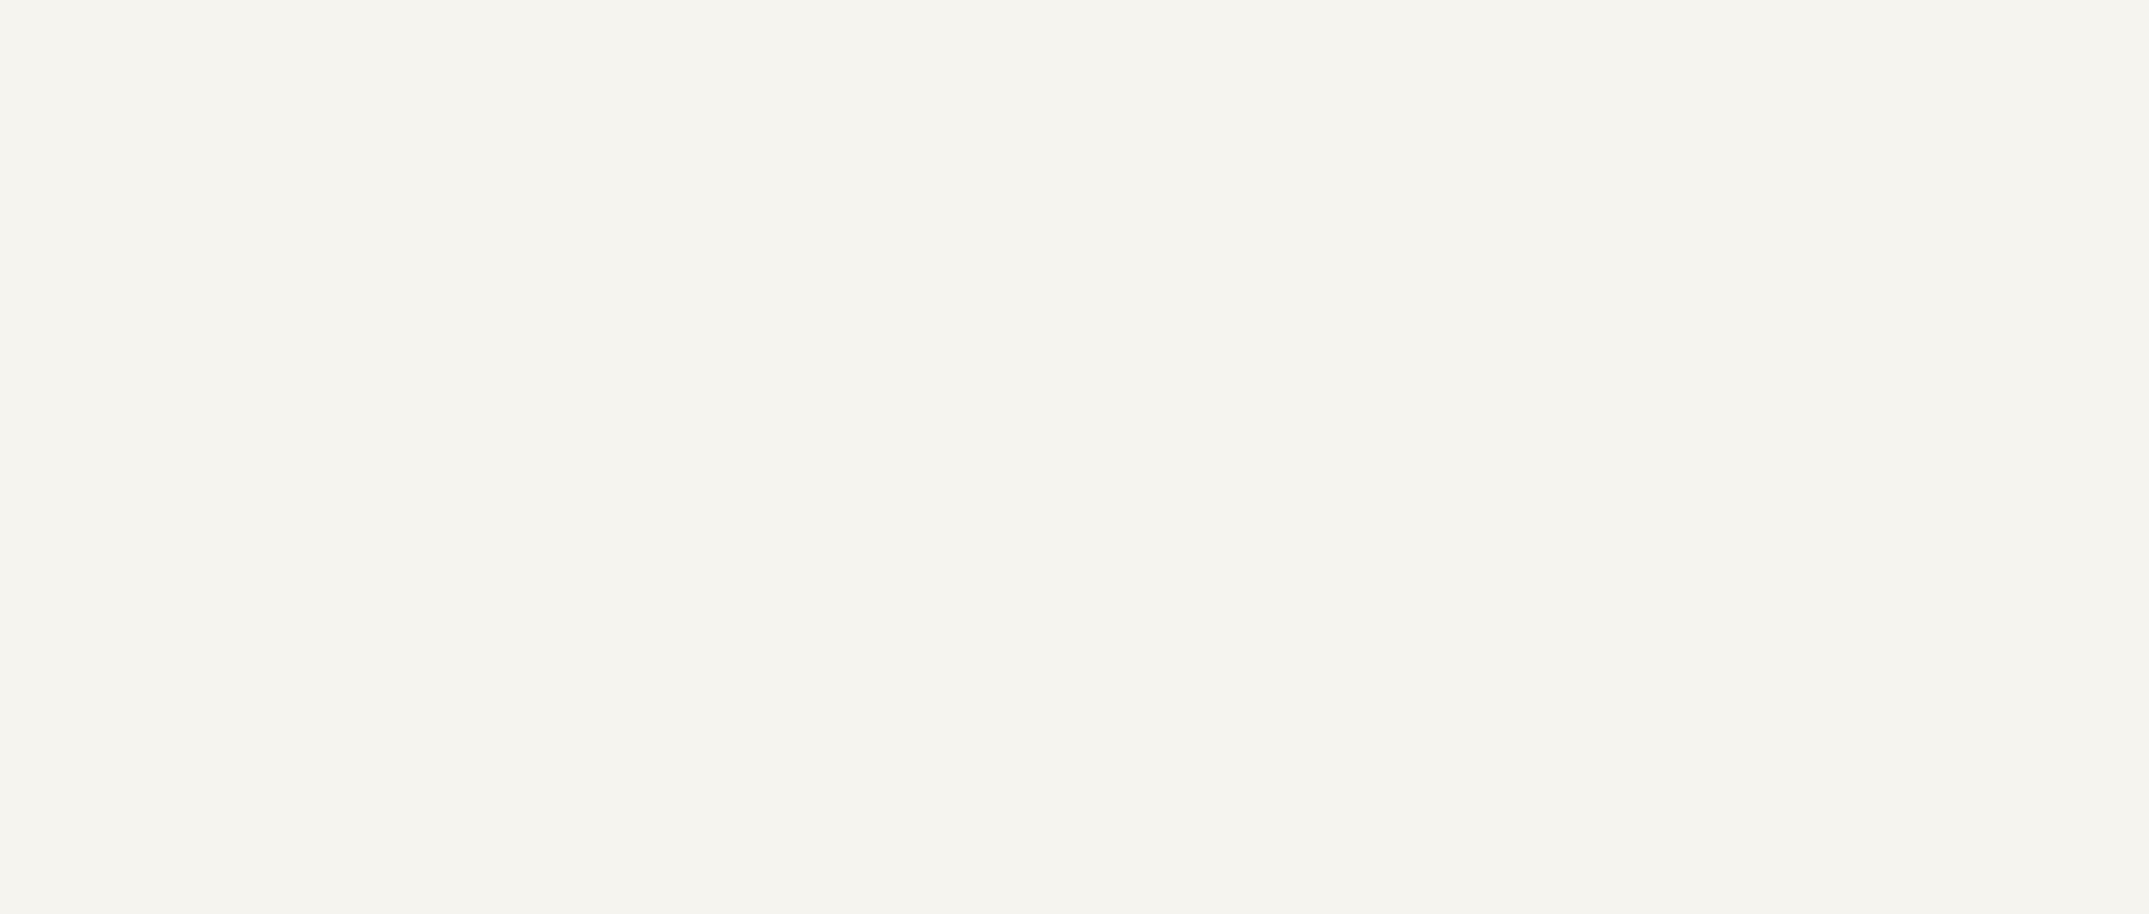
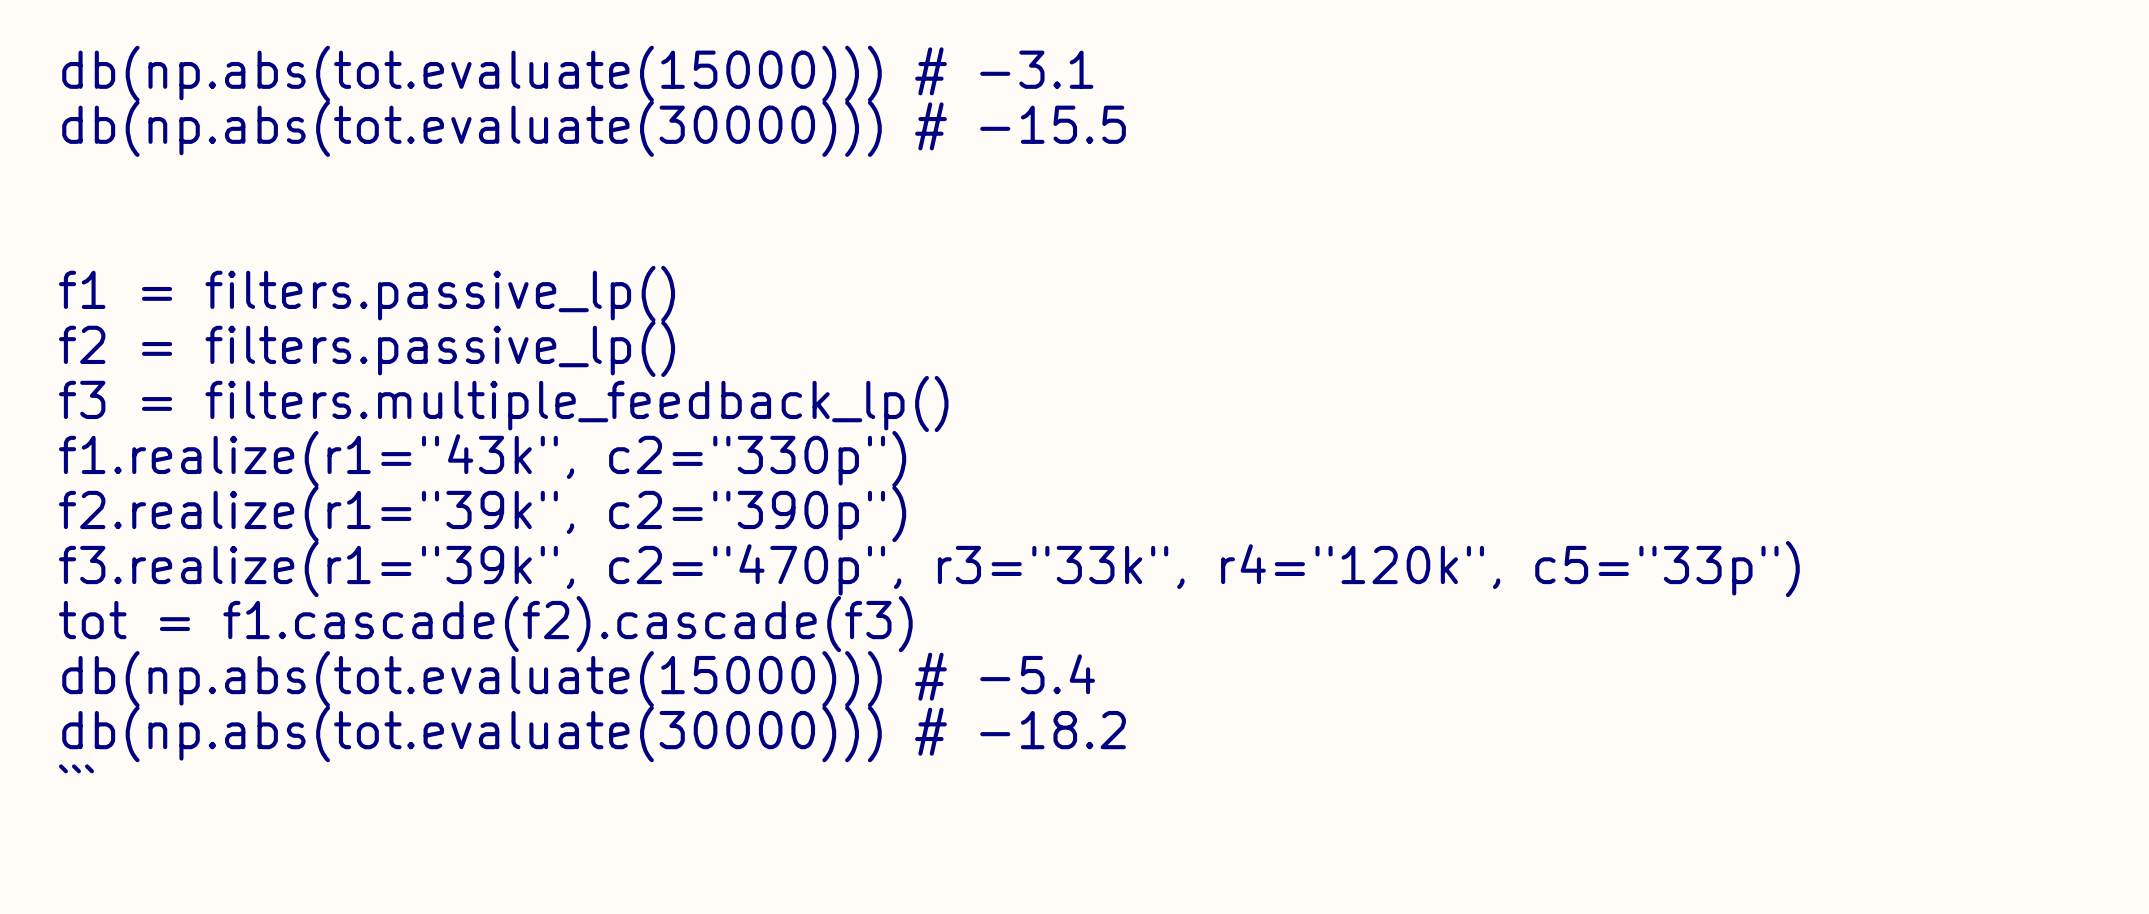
text: none -> db(np.abs(tot.evaluate(15000))) # -3.1 (577, 73)
text: none -> db(np.abs(tot.evaluate(30000))) # -15.5 (594, 128)
text: none -> f1 = filters.passive_lp() (367, 293)
text: none -> f2 = filters.passive_lp() (367, 348)
text: none -> f3 = filters.multiple_feedback_lp() (503, 403)
text: none -> f1.realize(r1="43k", c2="330p") (482, 459)
text: none -> f2.realize(r1="39k", c2="390p") (482, 514)
text: none -> f3.realize(r1="39k", c2="470p", r3="33k", r4="120k", c5="33p") (929, 569)
text: none -> tot = f1.cascade(f2).cascade(f3) (485, 624)
text: none -> db(np.abs(tot.evaluate(15000))) # -5.4 (578, 679)
text: none -> db(np.abs(tot.evaluate(30000))) # -18.2 (594, 734)
text: none -> ``` (76, 768)

